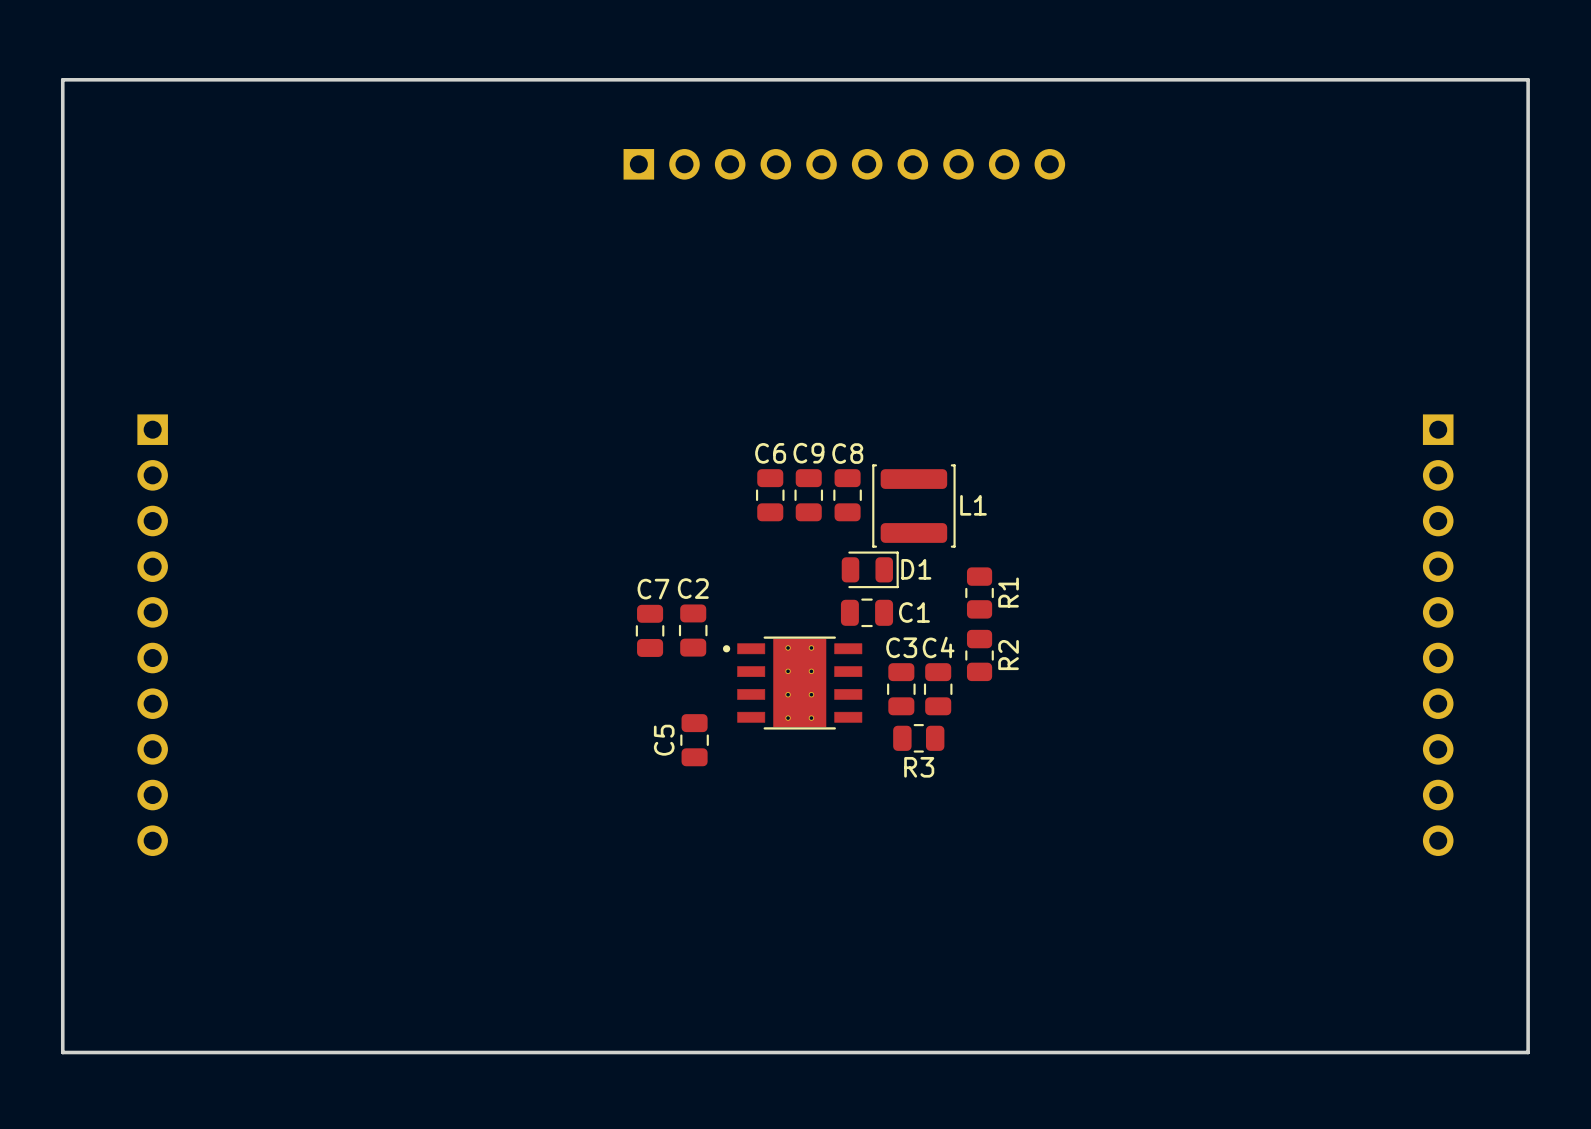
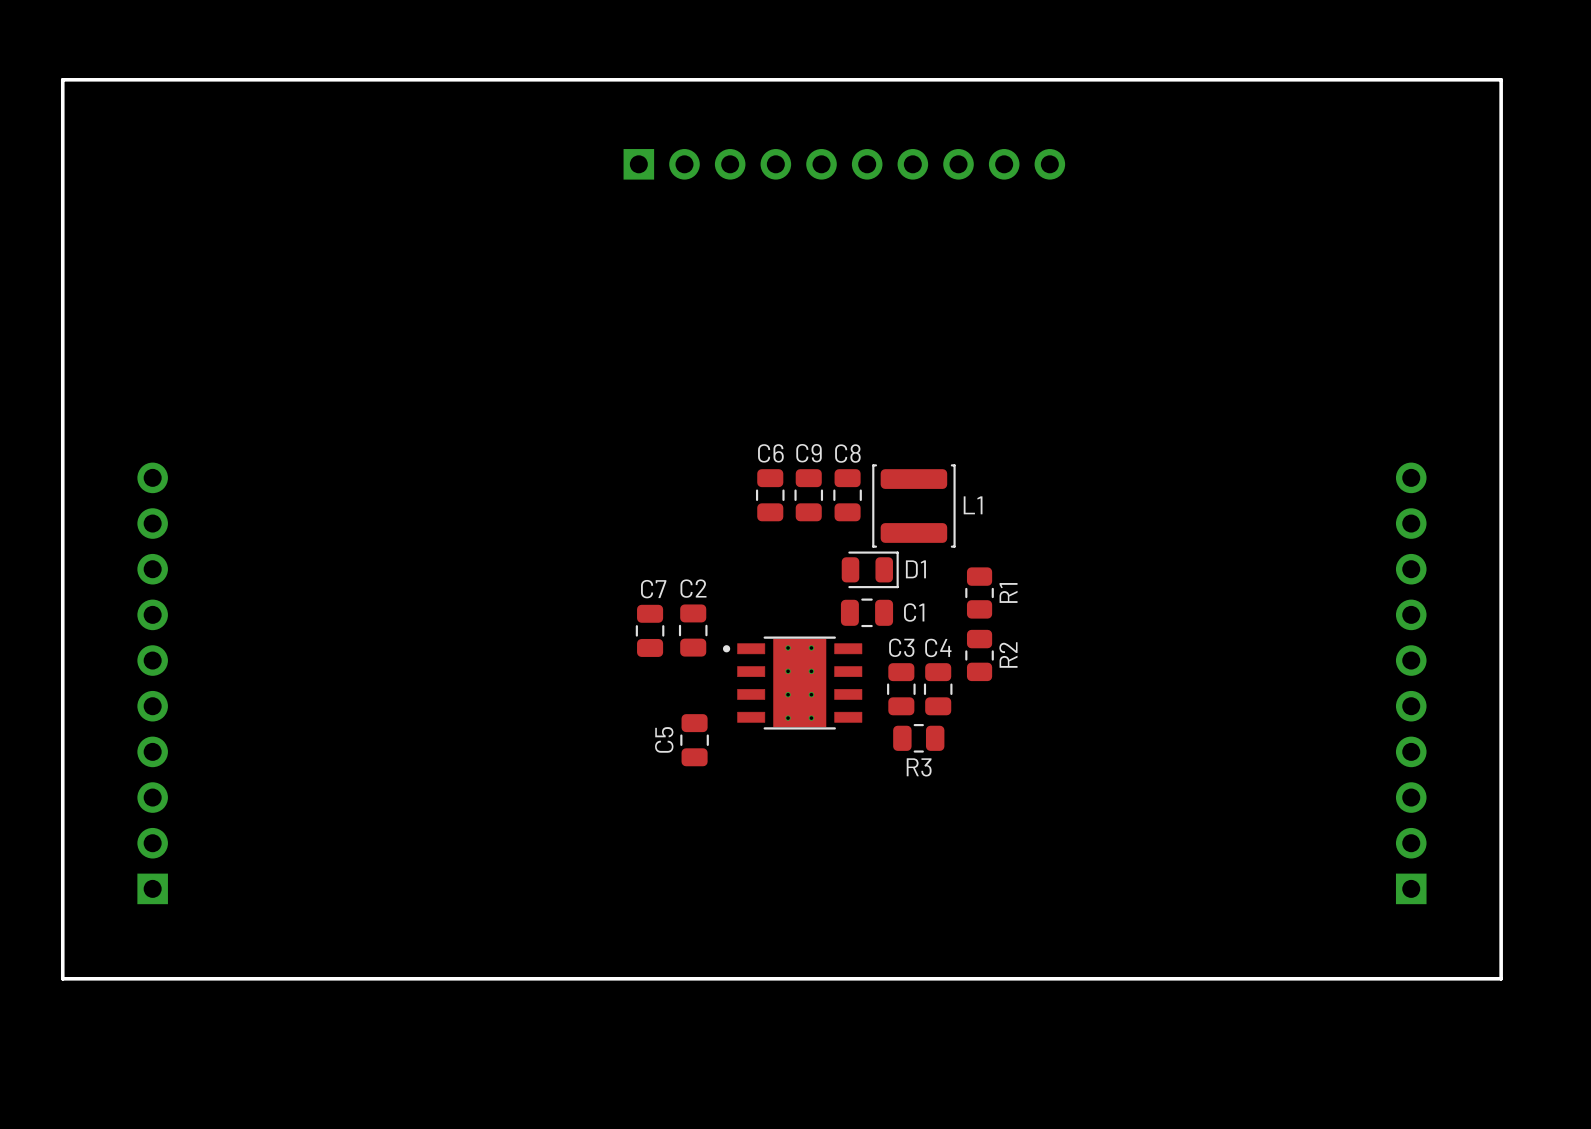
board edge: (1501, 79) (1528, 79) (1528, 1052) (62, 1052) (62, 978) -> (1501, 79) (1501, 978) (62, 978)
part rotation: 0° (152, 635) -> 180° (152, 683)
part rotation: 0° (1438, 635) -> 180° (1411, 683)

